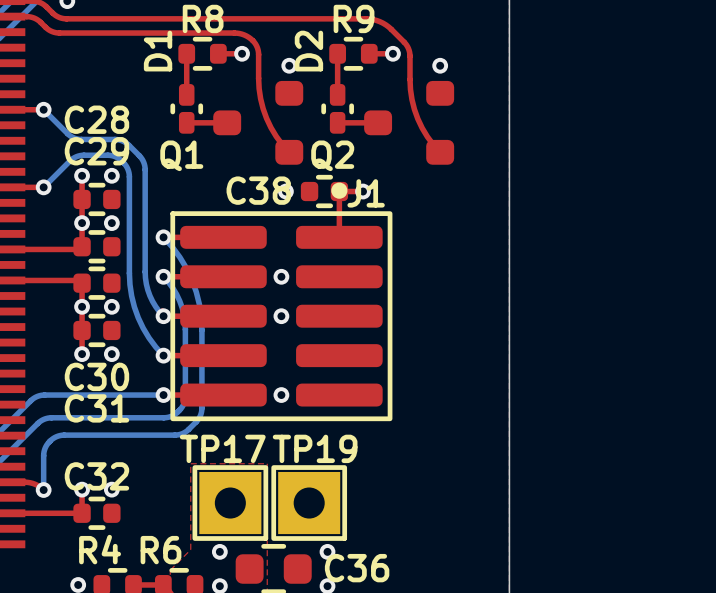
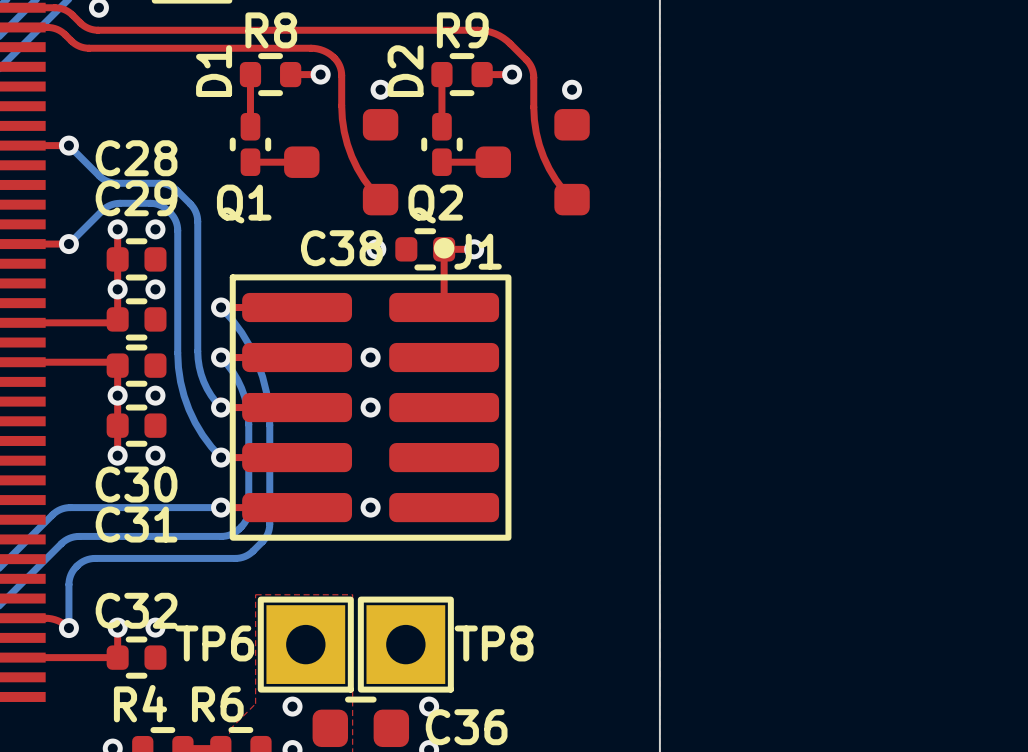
TP17 name: TP17 (222, 448) -> TP6 (214, 643)
TP19 name: TP19 (315, 448) -> TP8 (494, 643)

